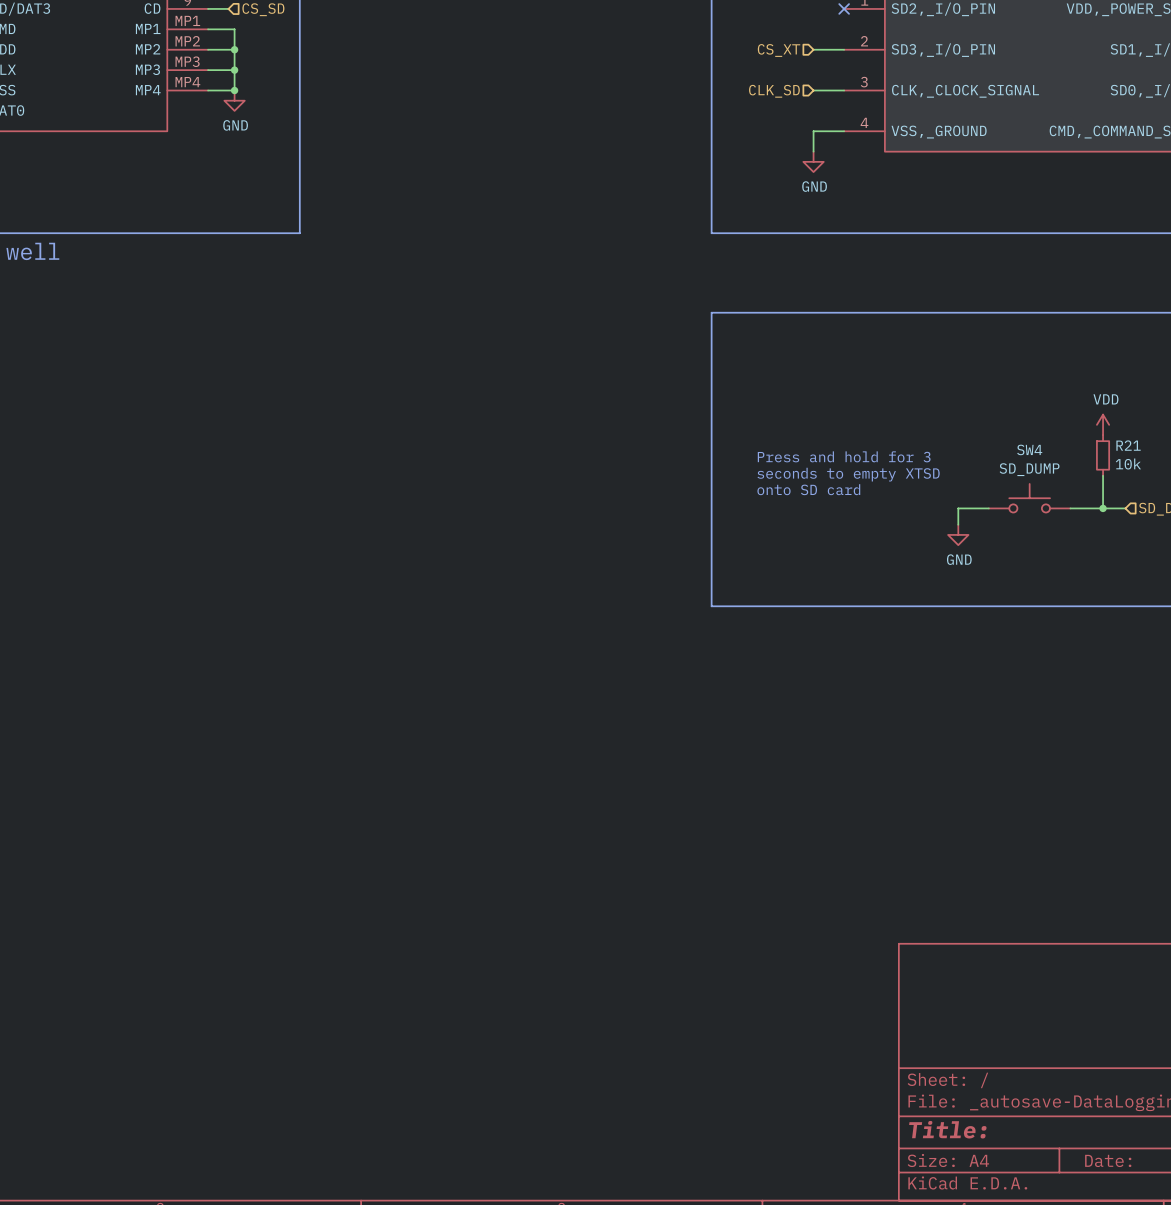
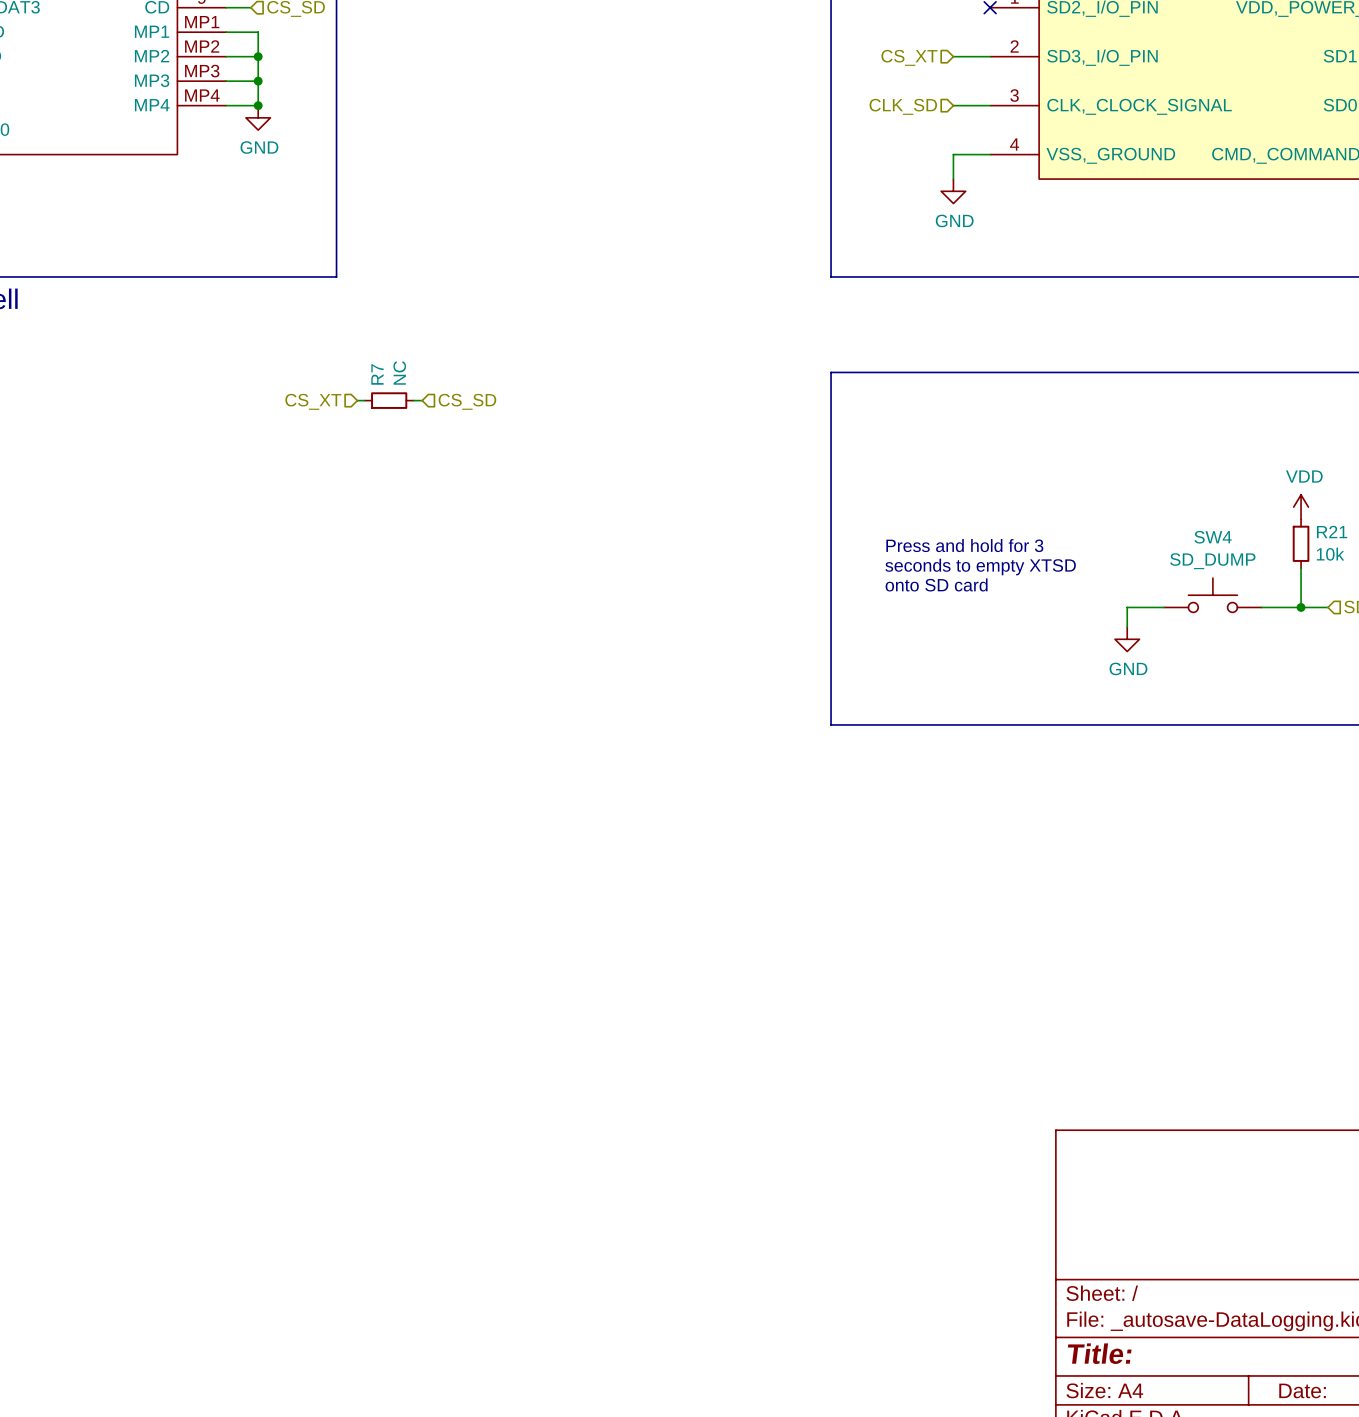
hierarchical label: none -> CS_XT (313, 401)
wire: none -> (357, 400) (364, 400)
R7: none -> NC (389, 400)
wire: none -> (413, 400) (422, 400)
hierarchical label: none -> CS_SD (467, 401)

